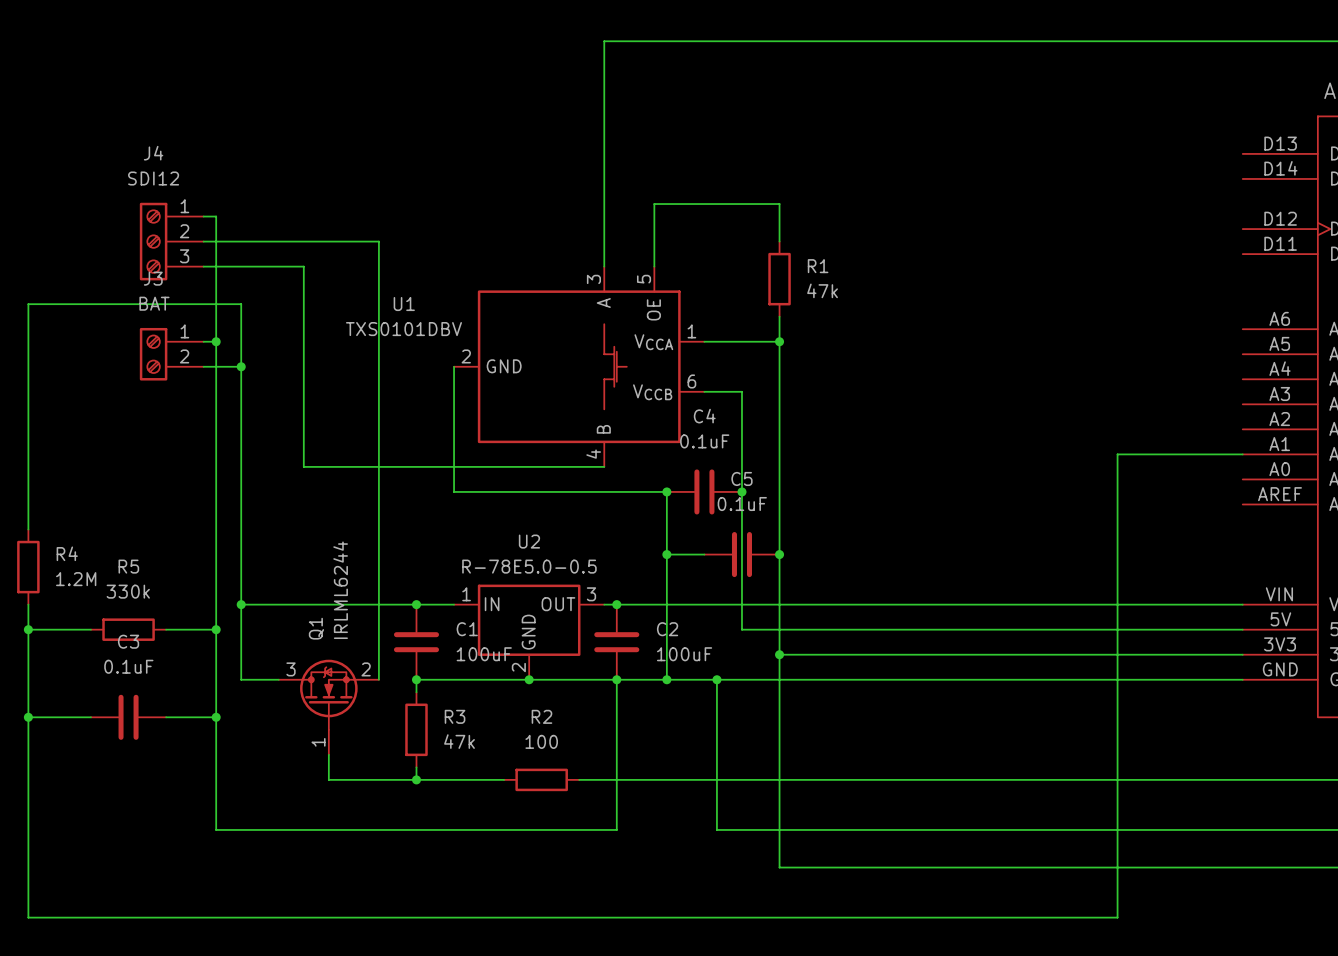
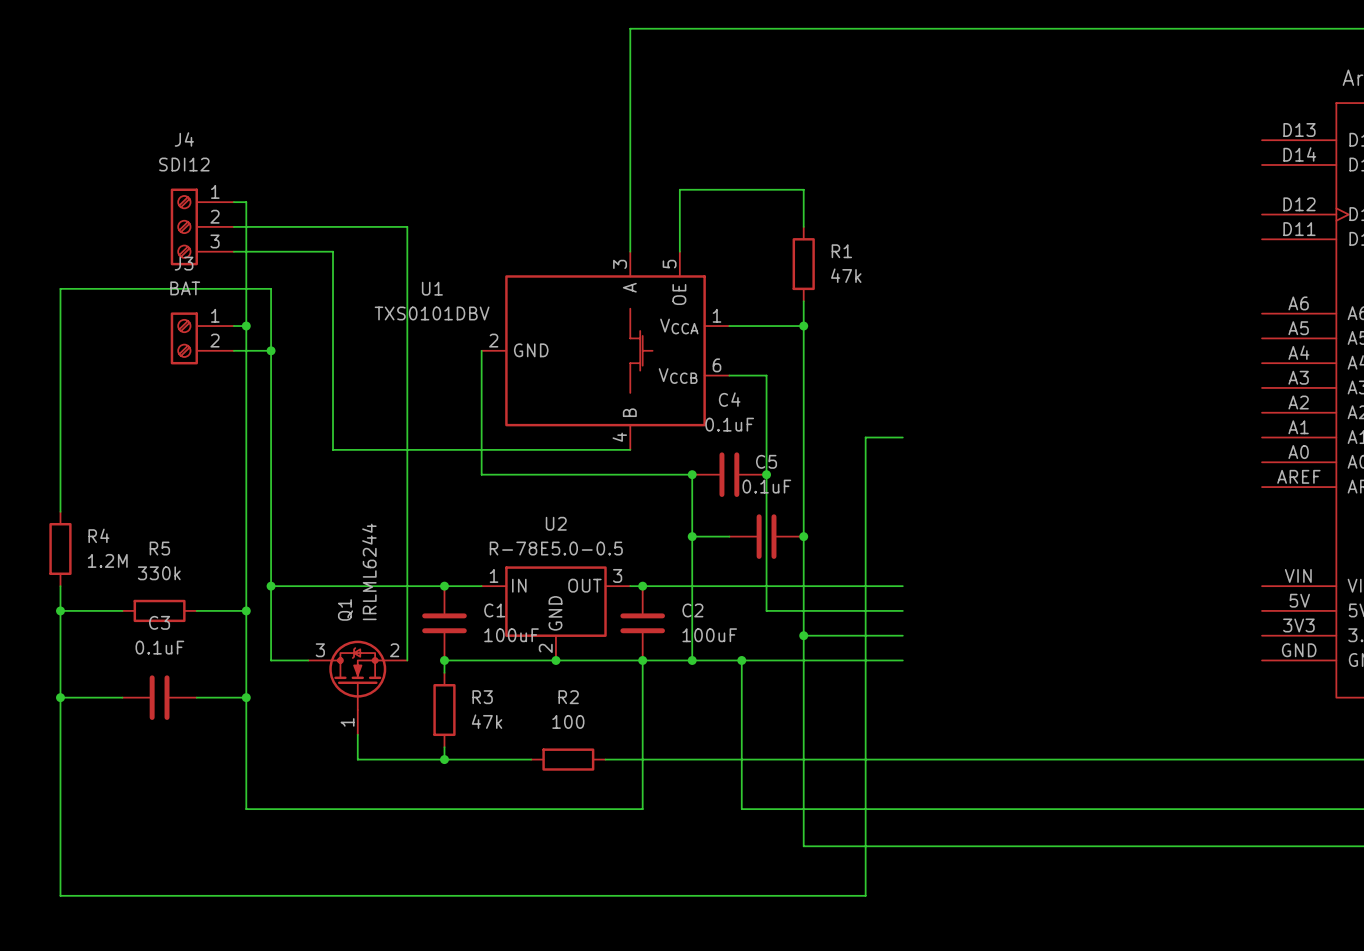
wire: (1242, 454) (1117, 454) (1117, 917) (842, 917) -> (902, 437) (865, 437) (865, 895)
wire: (879, 604) (1242, 604) -> none
wire: (879, 629) (1242, 629) -> none
wire: (879, 654) (1242, 654) -> none
wire: (879, 679) (1242, 679) -> none

